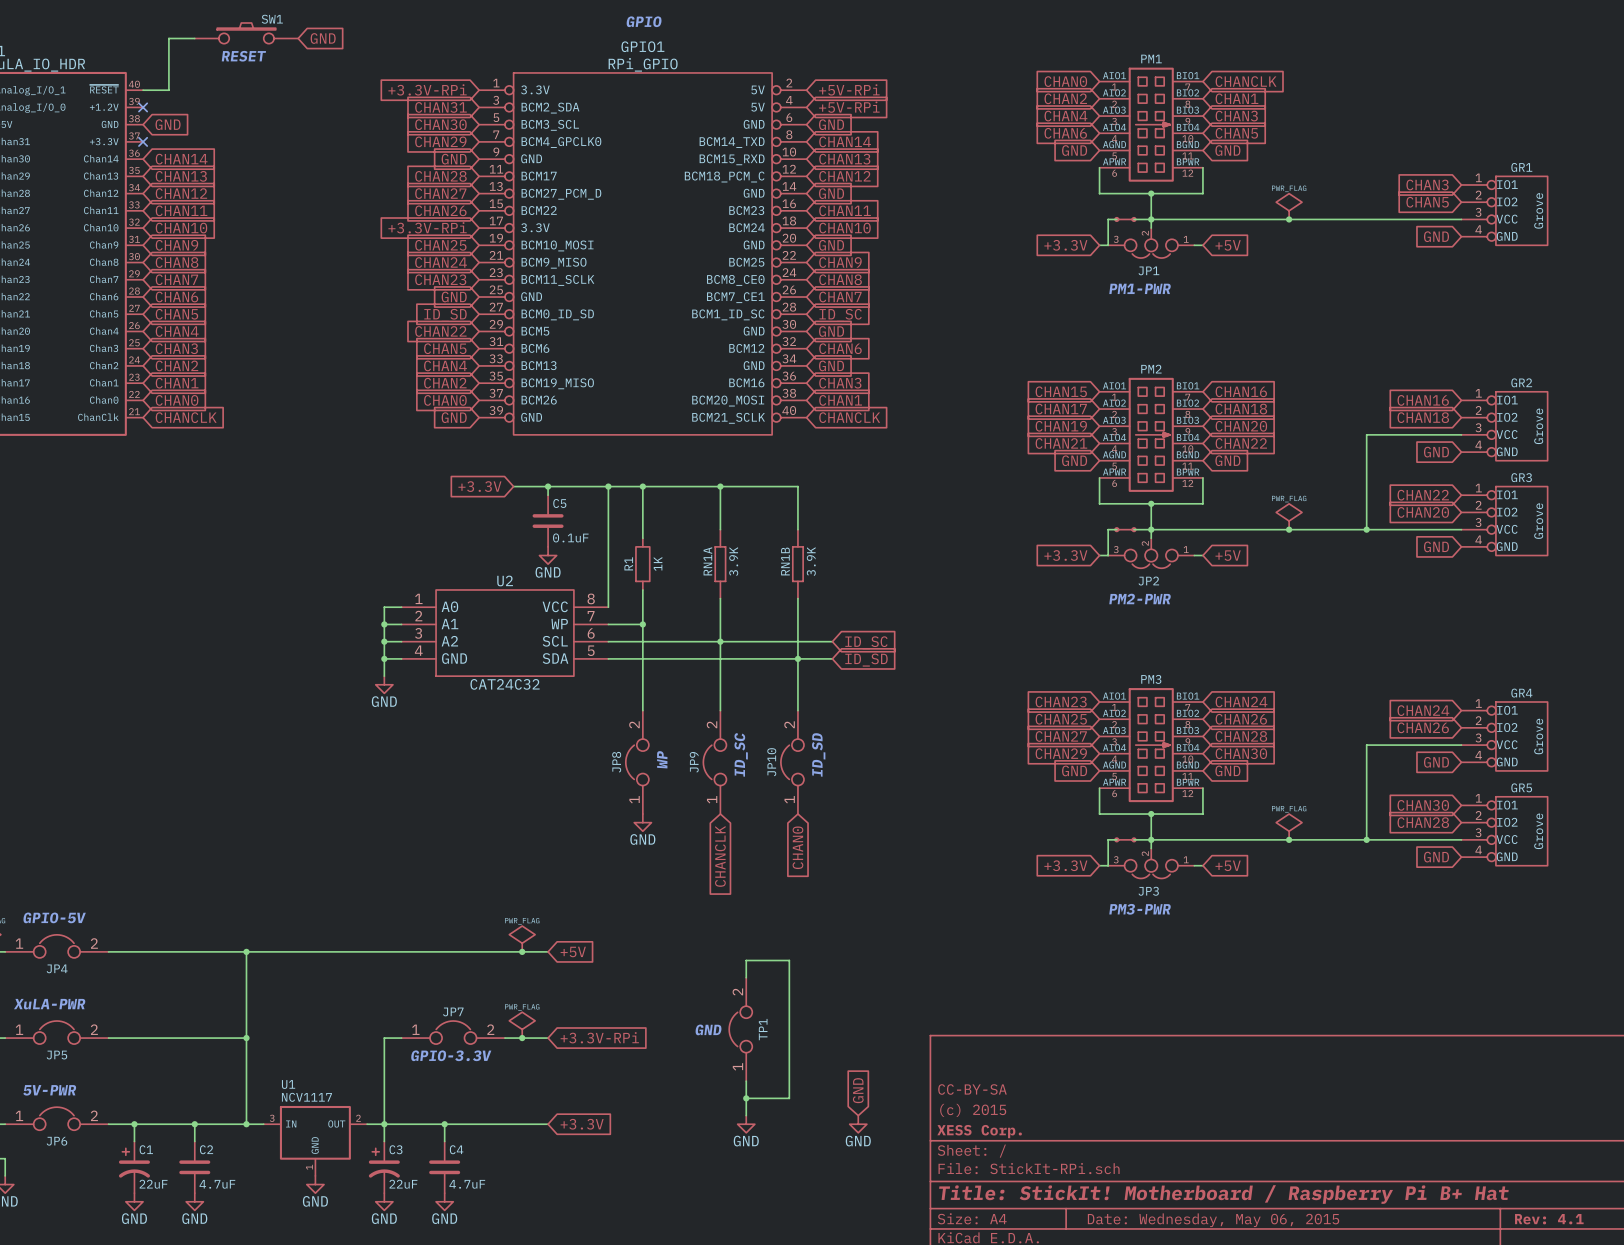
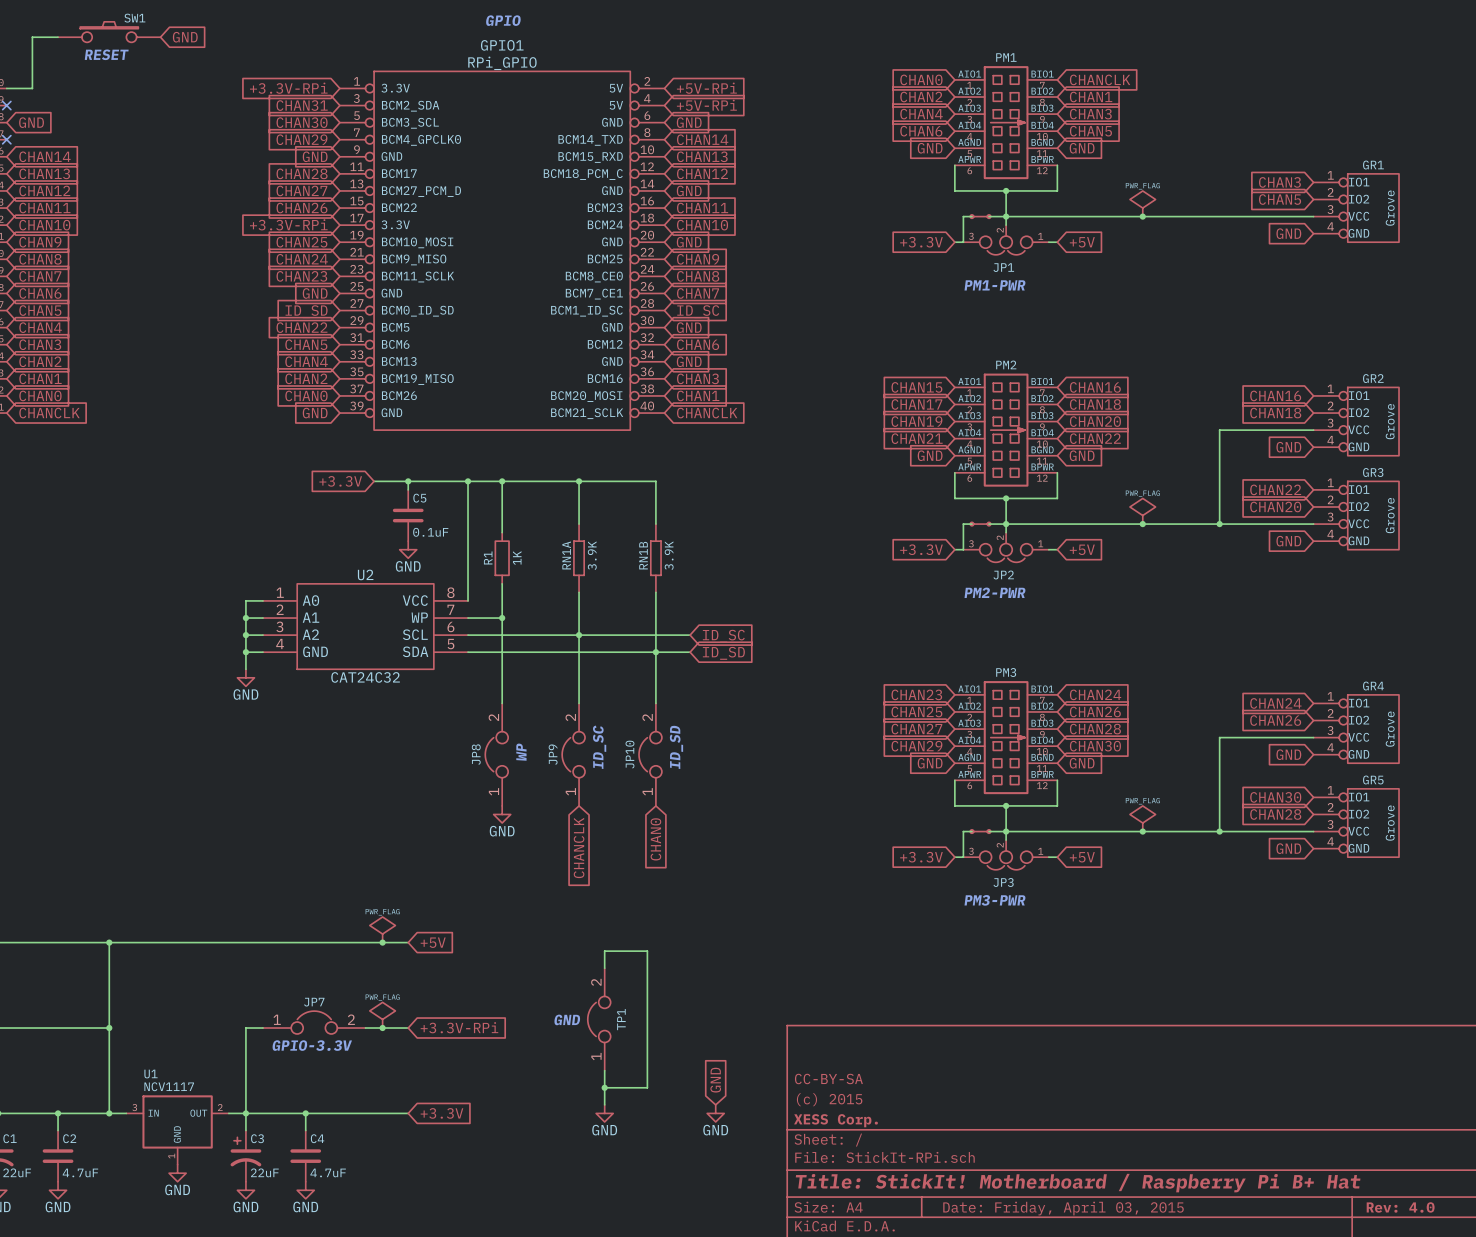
title block: Rev: 4.1 (1549, 1219) -> Rev: 4.0 (1400, 1207)
title block: Date: Wednesday, May 06, 2015 (1213, 1220) -> Date: Friday, April 03, 2015 (1063, 1208)

